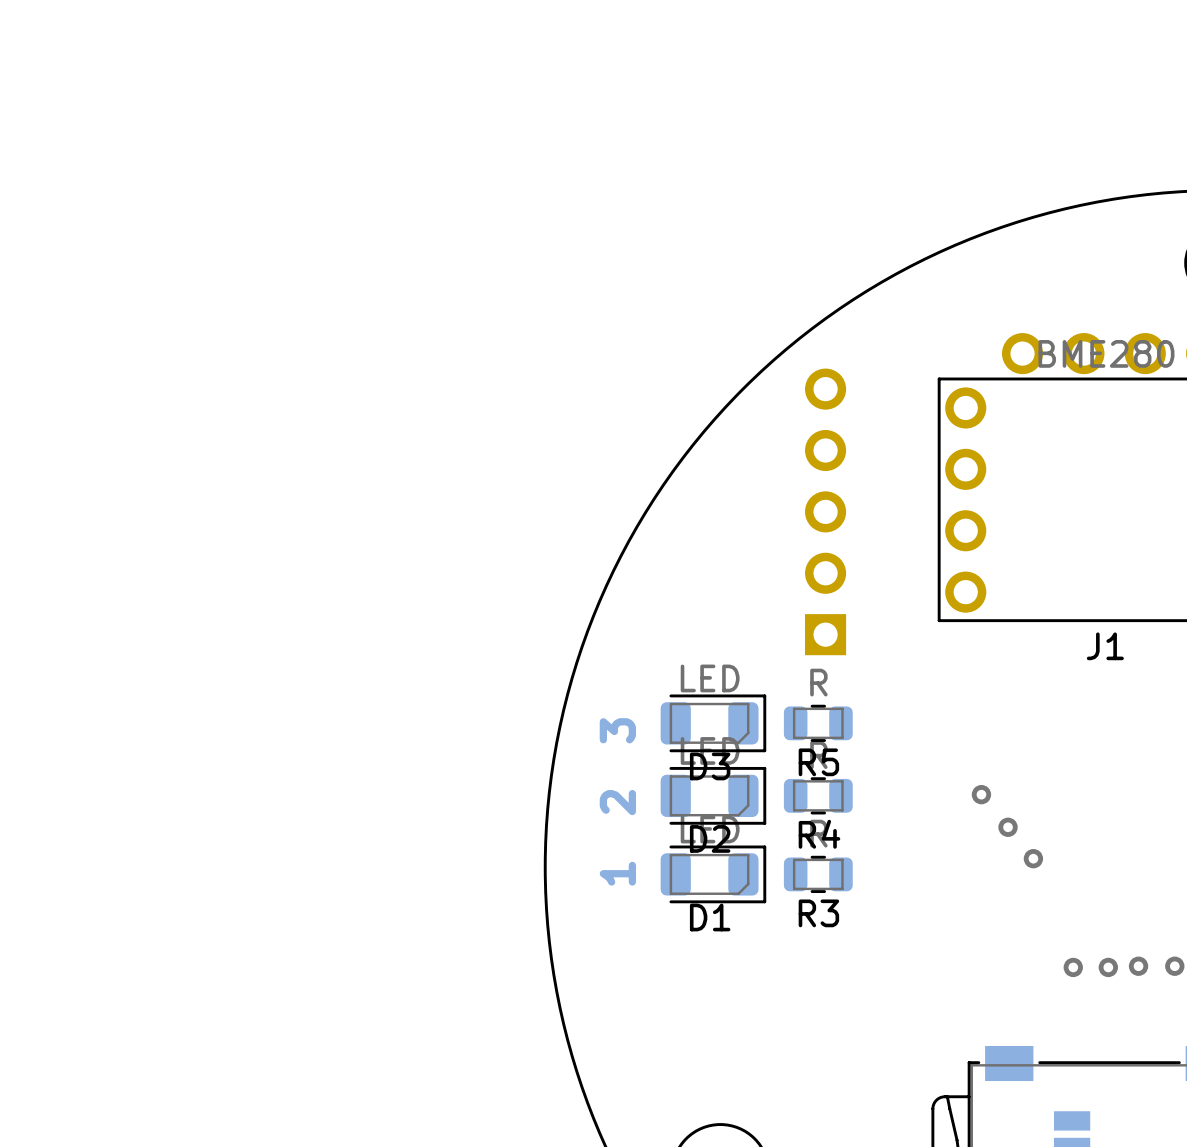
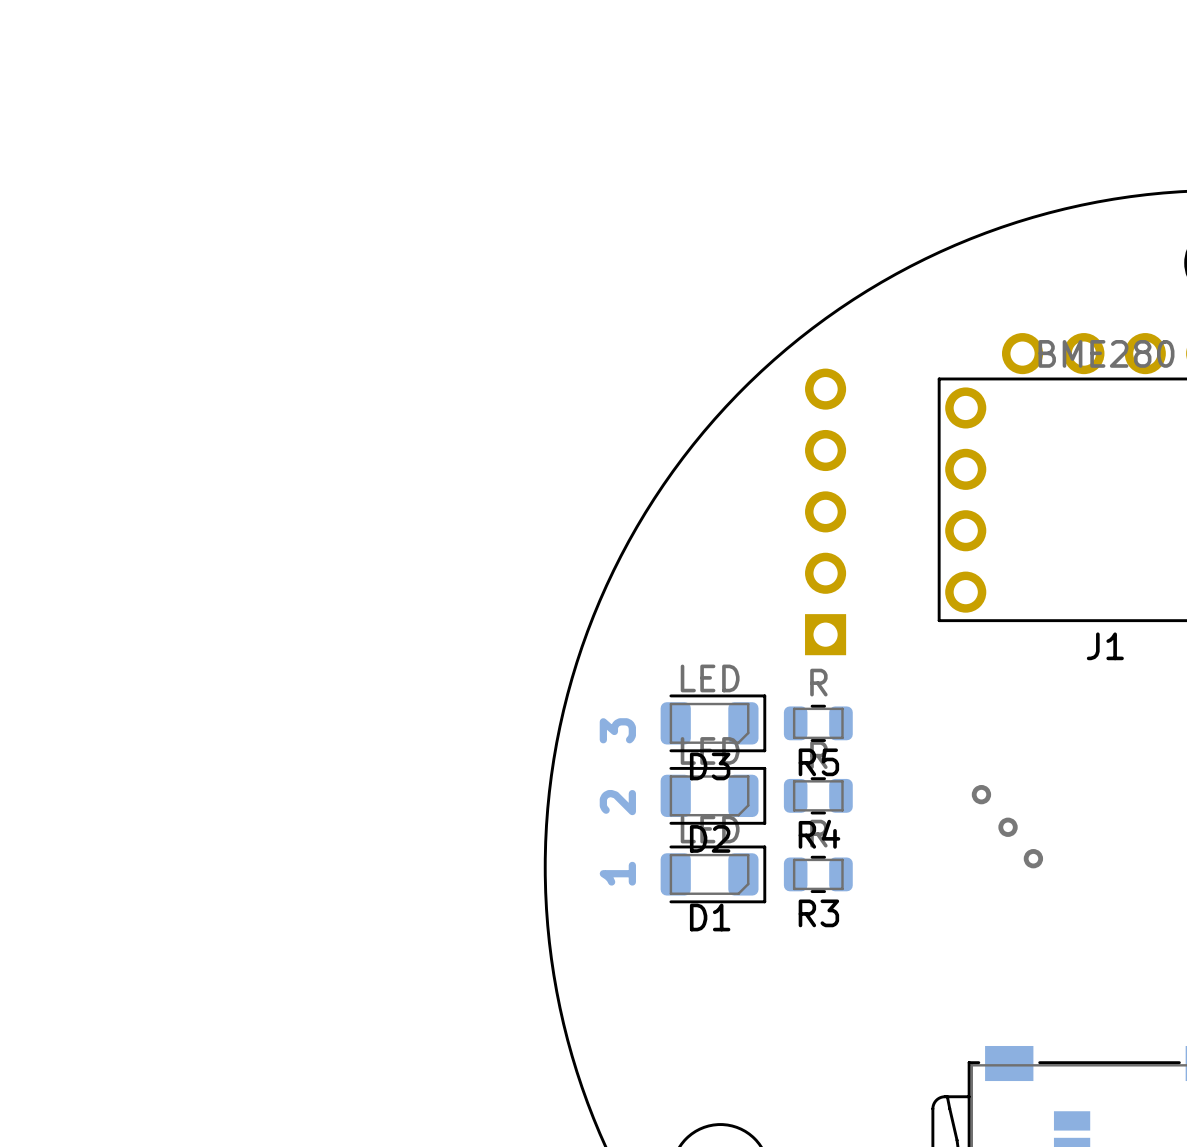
via: (1138, 966) -> none
via: (1174, 966) -> none
via: (1073, 967) -> none
via: (1108, 967) -> none

